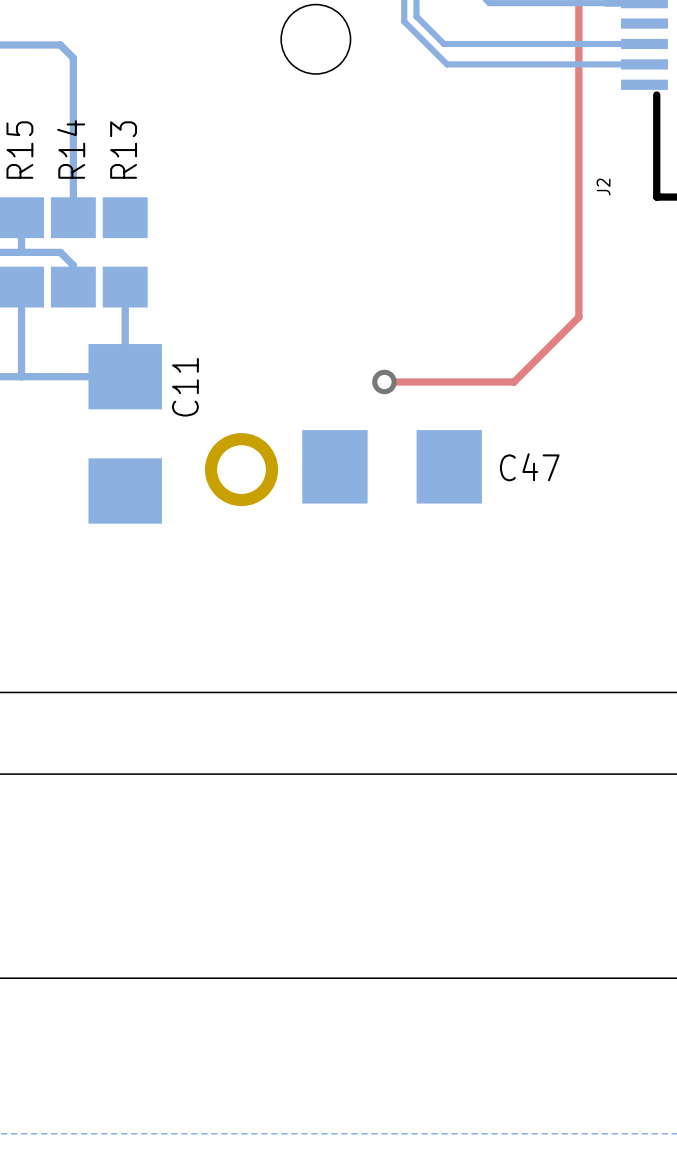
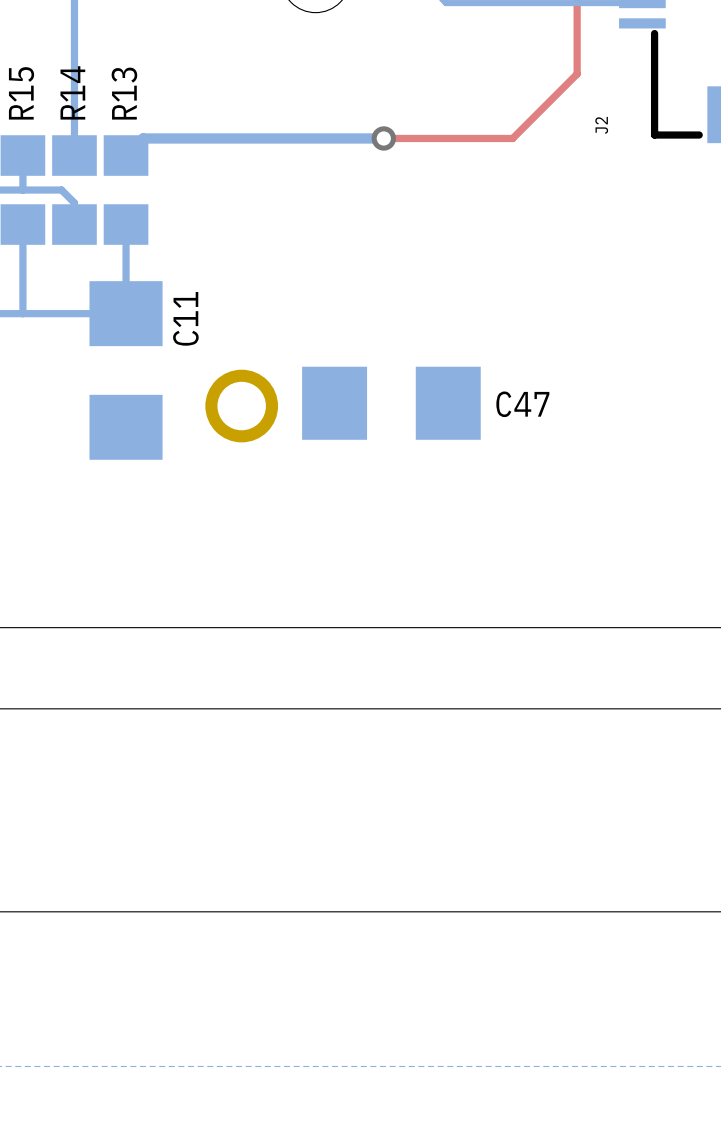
top track: (578, 135) (578, 317) (514, 382) (384, 382) -> (577, 74) (512, 138) (383, 138)
bottom track: none -> (383, 138) (143, 138) (126, 155)
via position: (384, 382) -> (383, 138)

